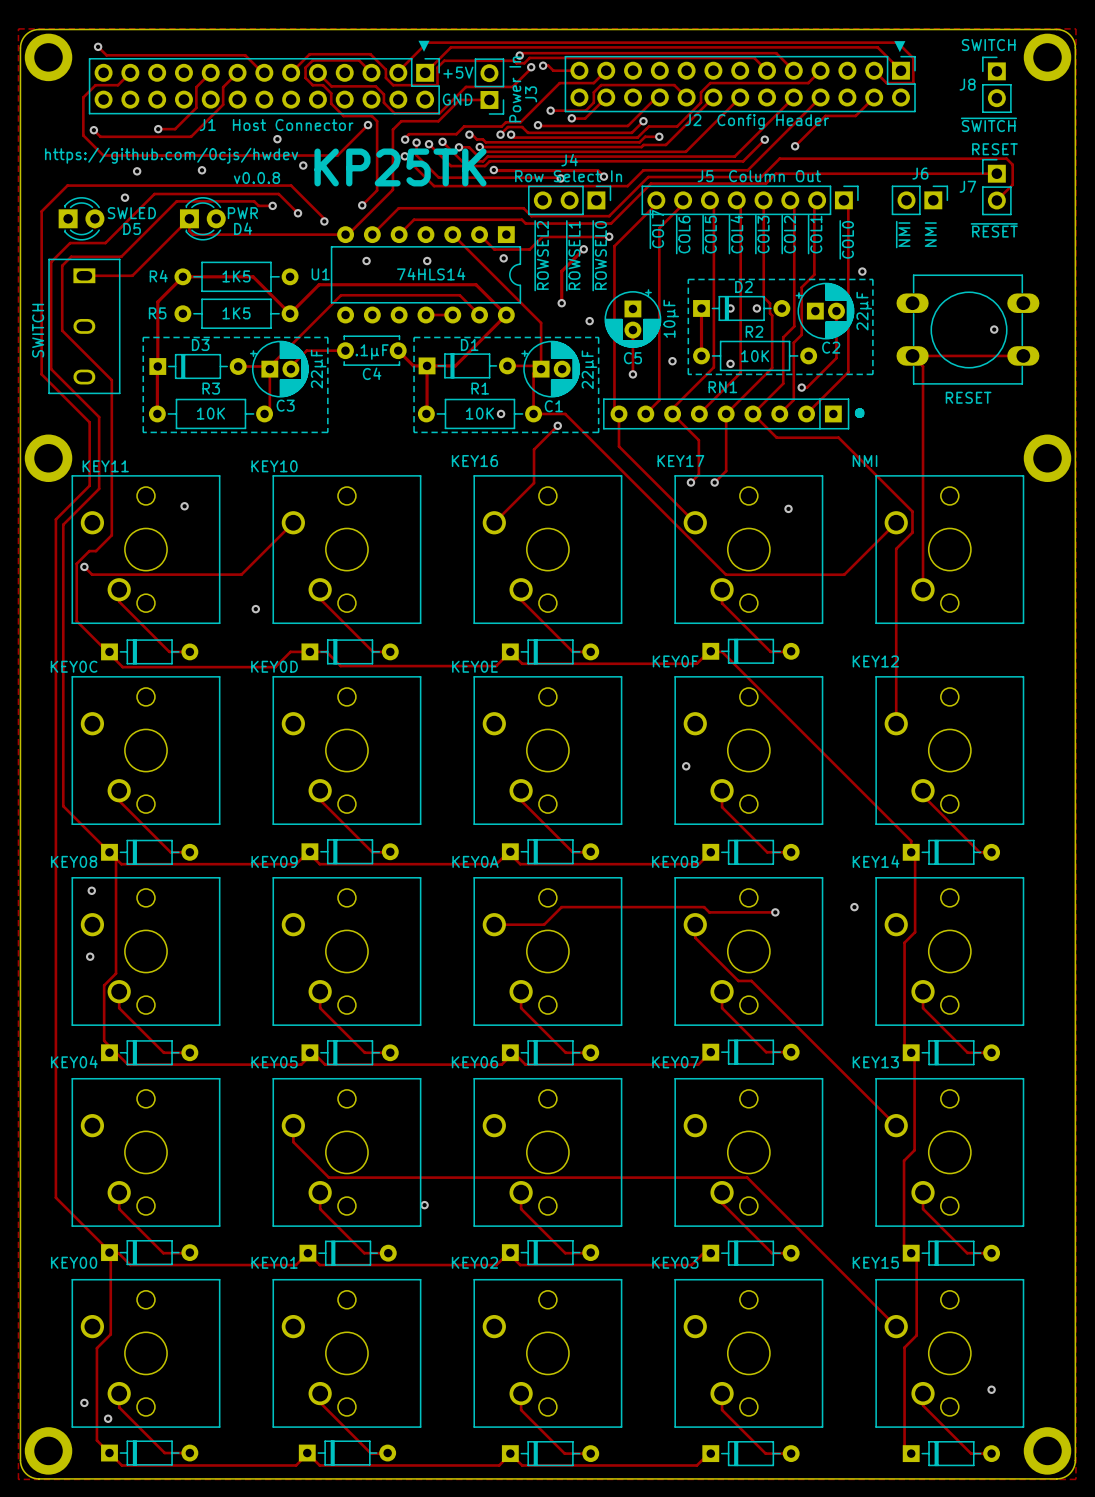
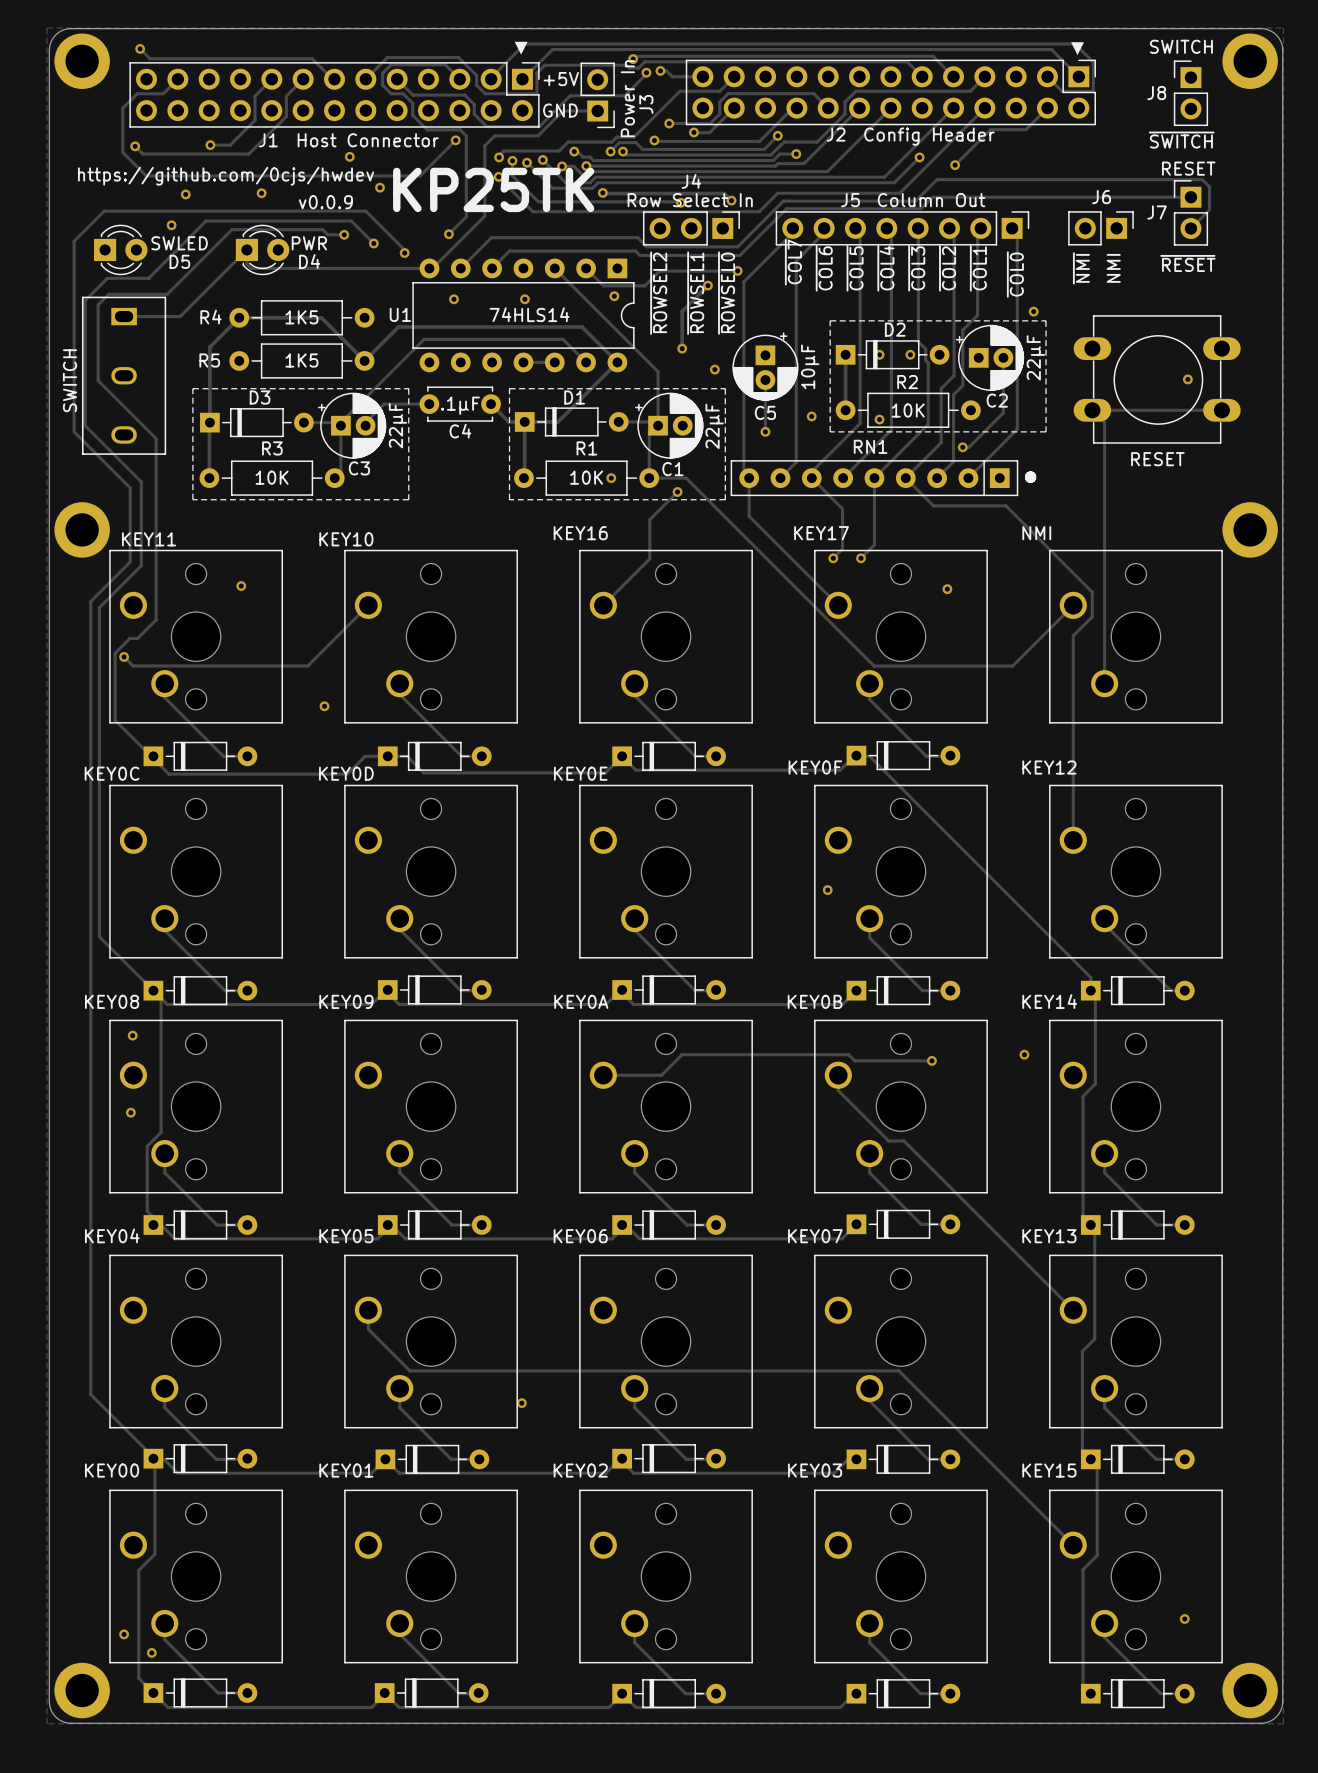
text: v0.0.8 (256, 177) -> v0.0.9 (325, 202)

